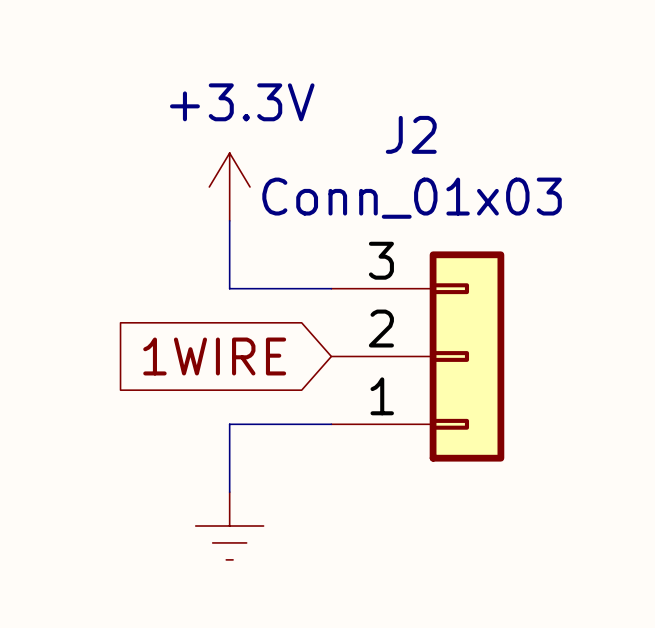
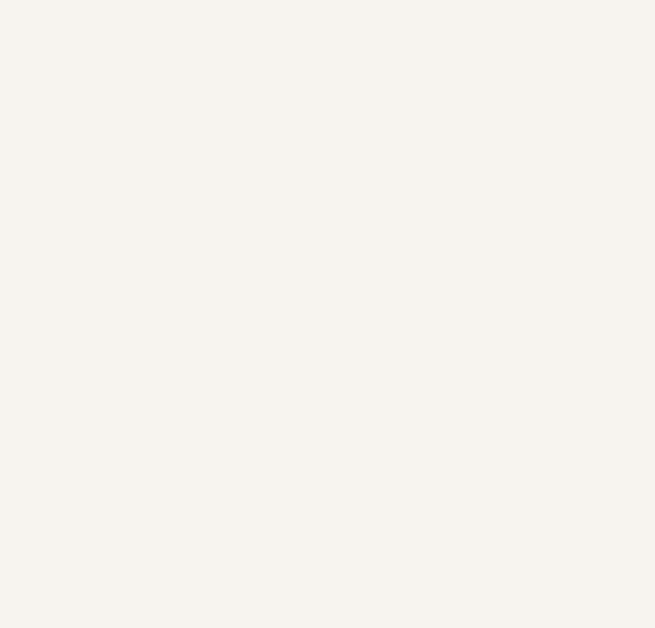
power symbol: +3.3V (229, 186) -> none
wire: (229, 220) (229, 288) (331, 288) -> none
global label: 1WIRE (214, 356) -> none
J2: Conn_01x03 (417, 356) -> none
wire: (331, 424) (229, 424) (229, 492) -> none
power symbol: (229, 526) -> none

